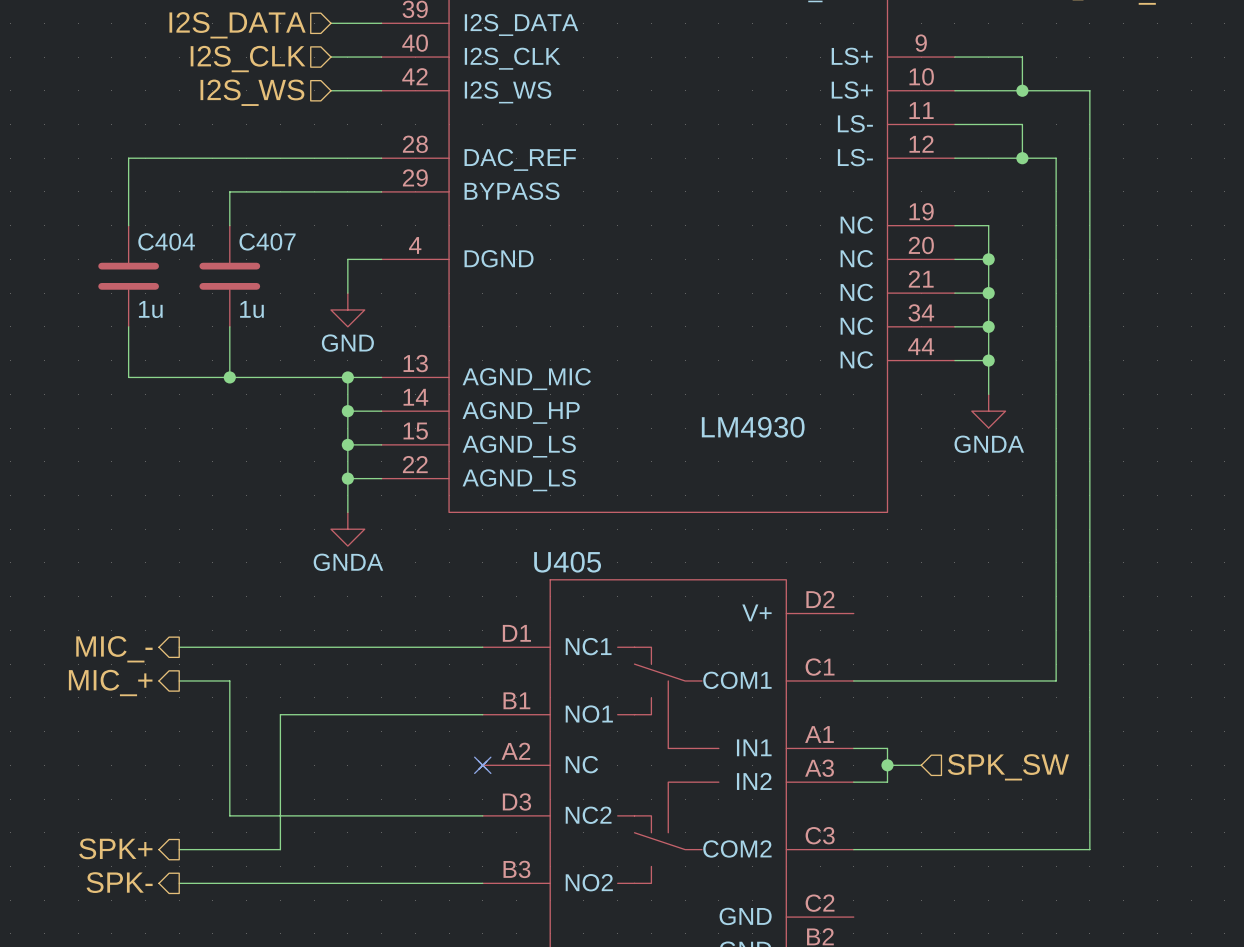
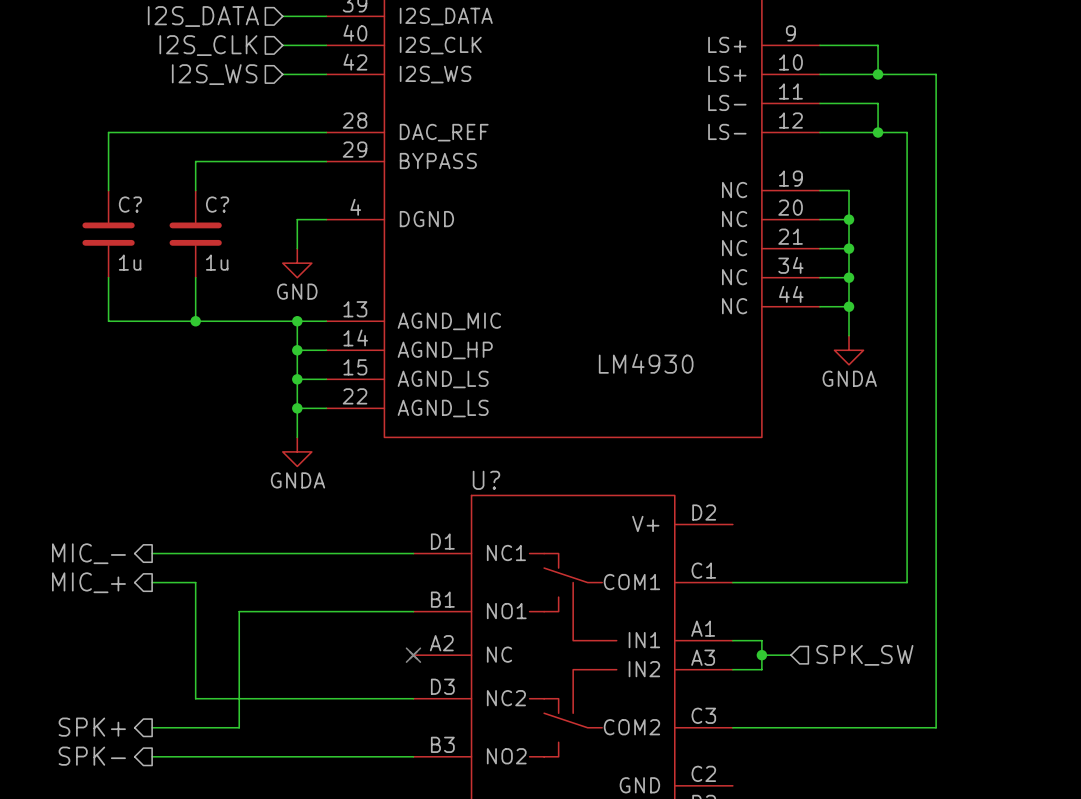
C404 name: C404 (166, 241) -> C? (130, 204)
C407 name: C407 (267, 241) -> C? (217, 204)
U405 name: U405 (567, 562) -> U? (486, 480)

